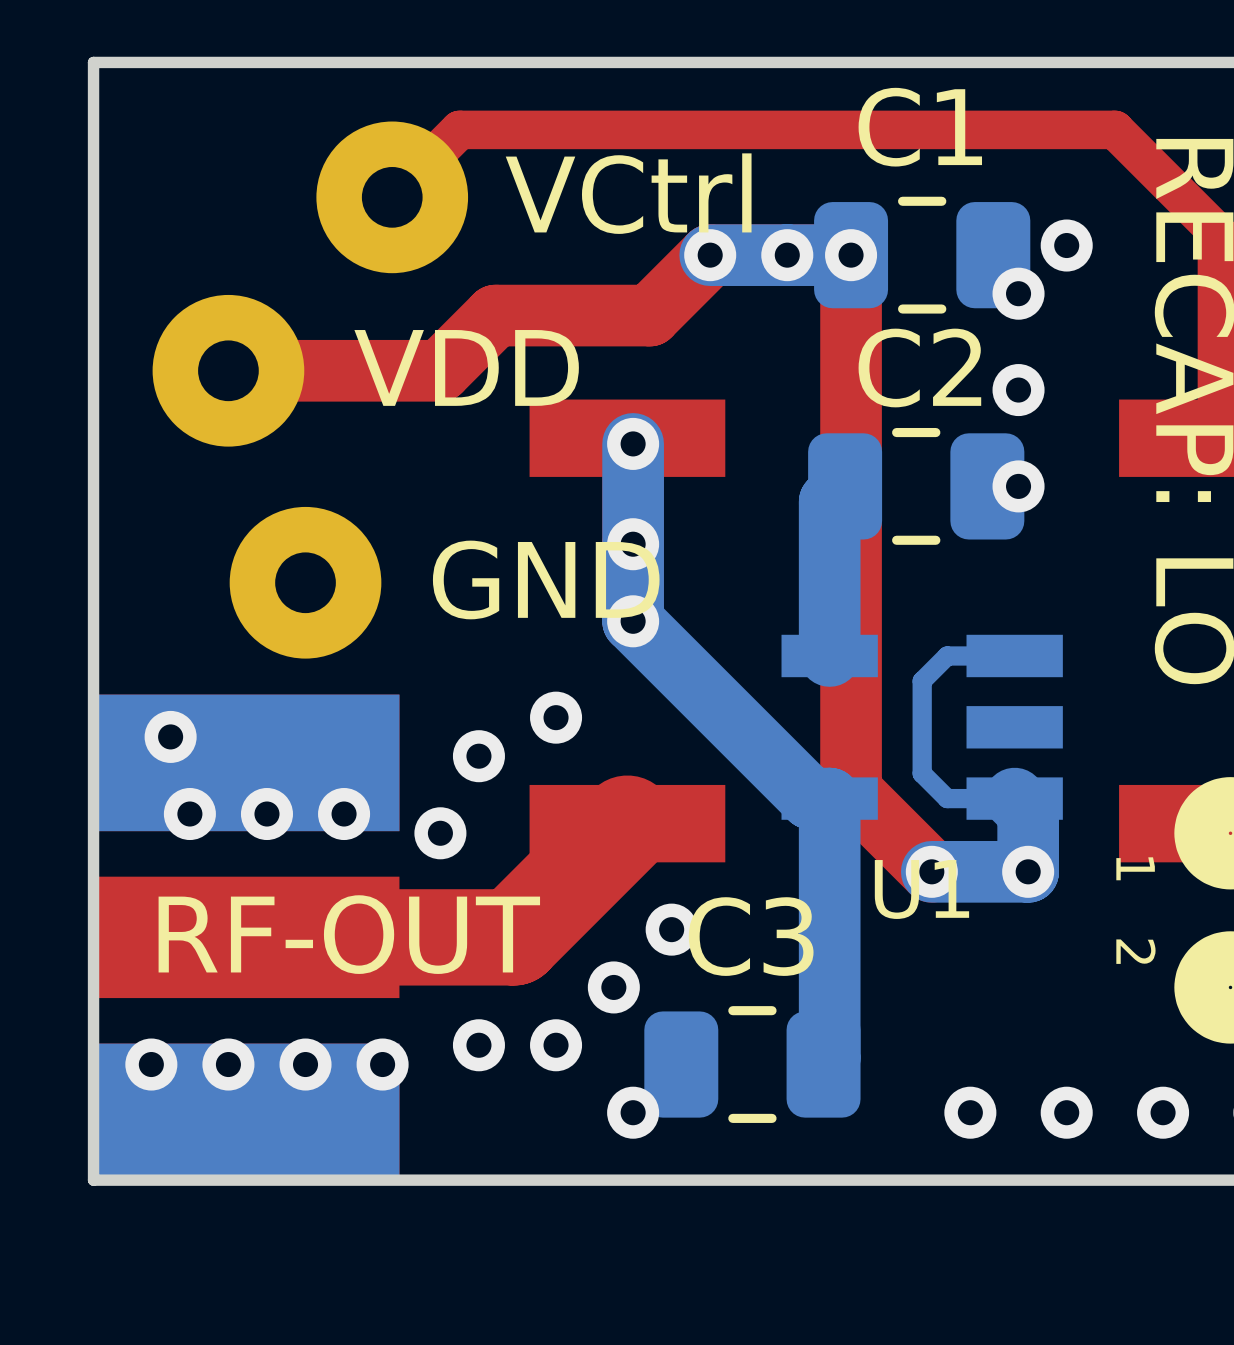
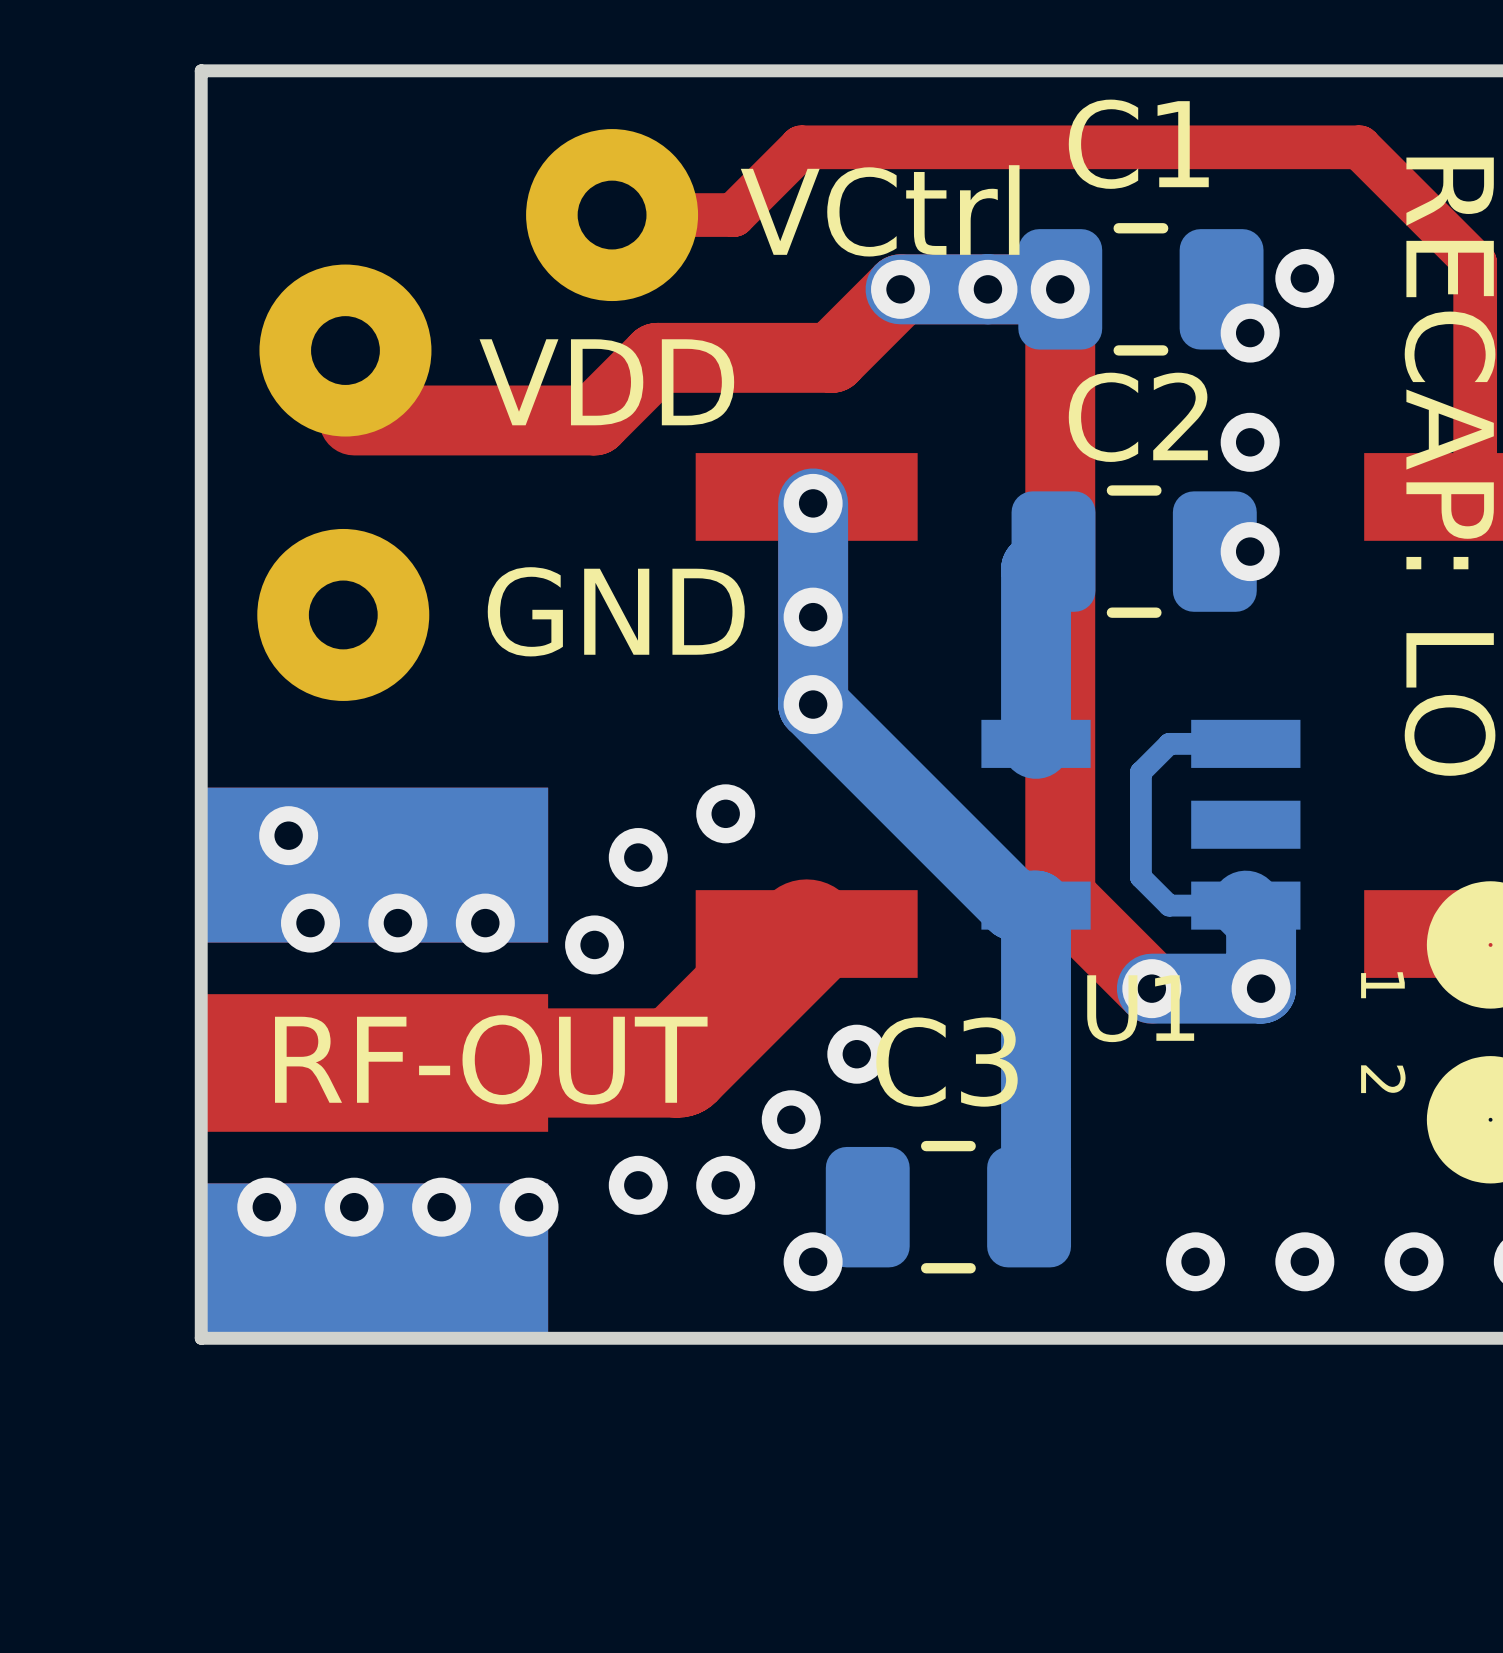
top track: (622, 129) (459, 129) (396, 193) -> (801, 147) (733, 215) (612, 215)
VCtrl position: (392, 197) -> (612, 215)
VDD name position: VDD (466, 367) -> VDD (606, 382)
VDD position: (228, 370) -> (345, 350)
GND position: (305, 582) -> (343, 614)

